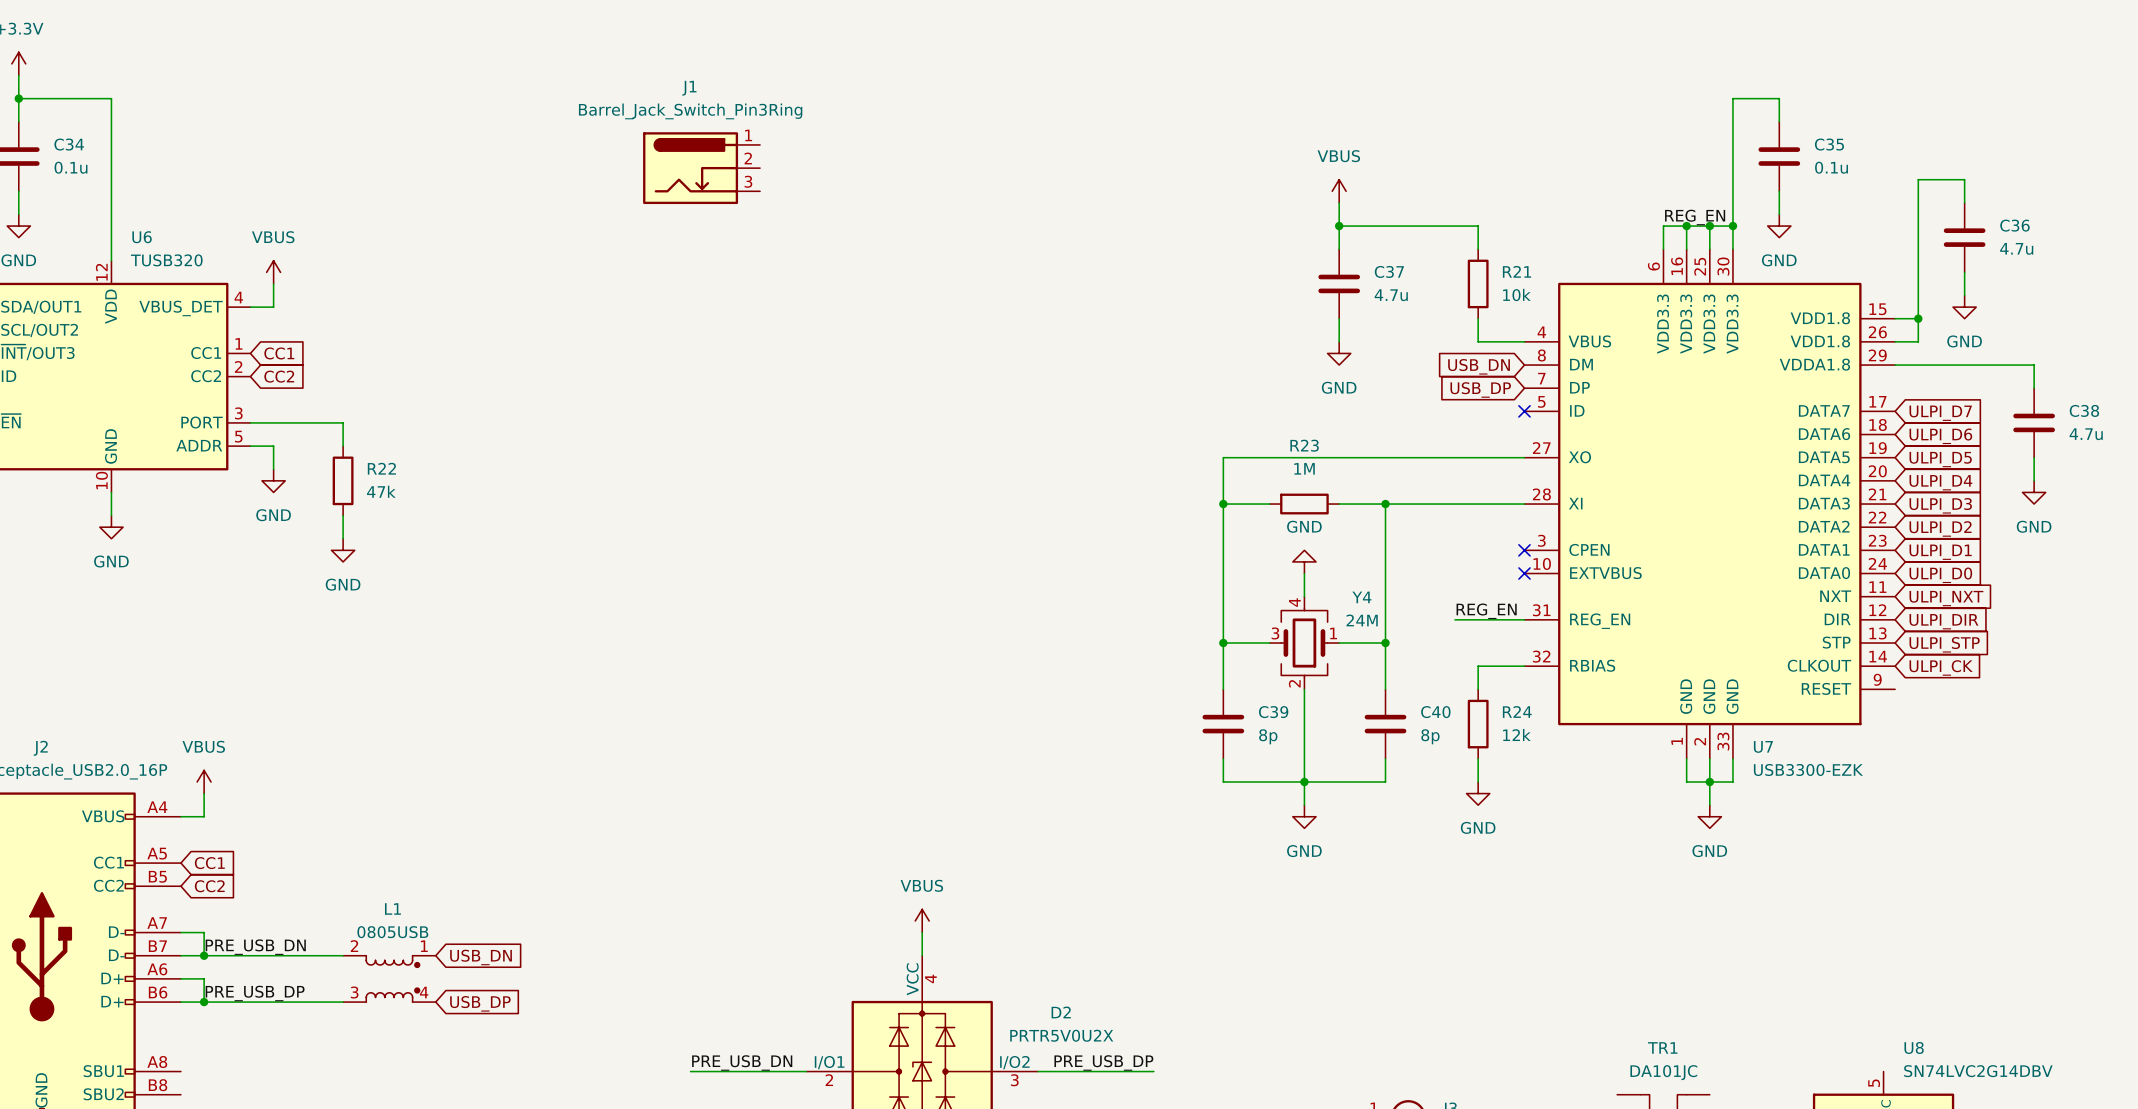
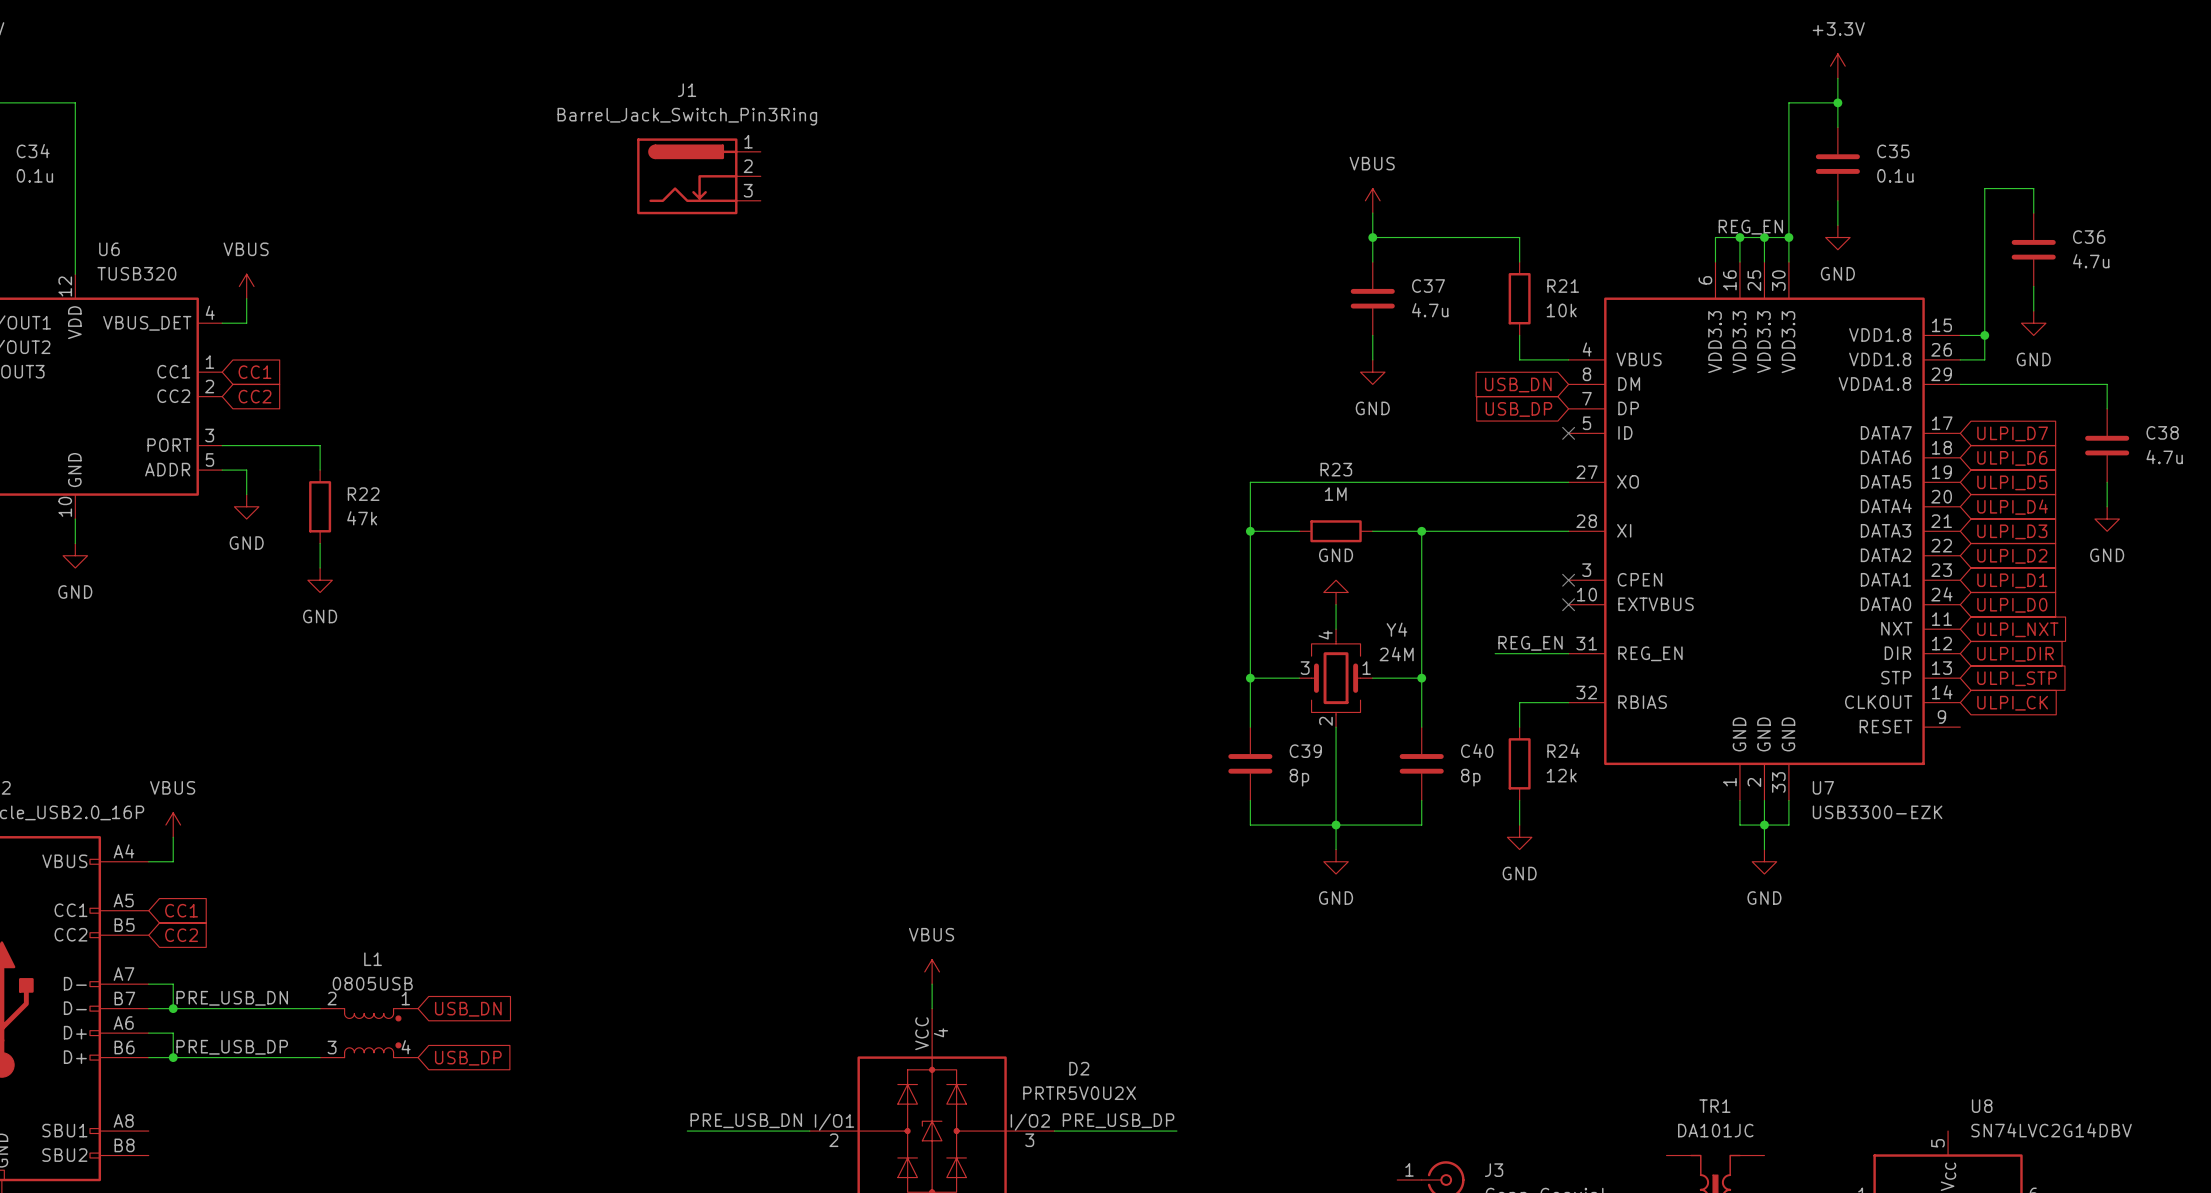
power symbol: none -> +3.3V (1837, 66)
wire: none -> (1837, 78) (1837, 102)
junction: none -> (1837, 102)

